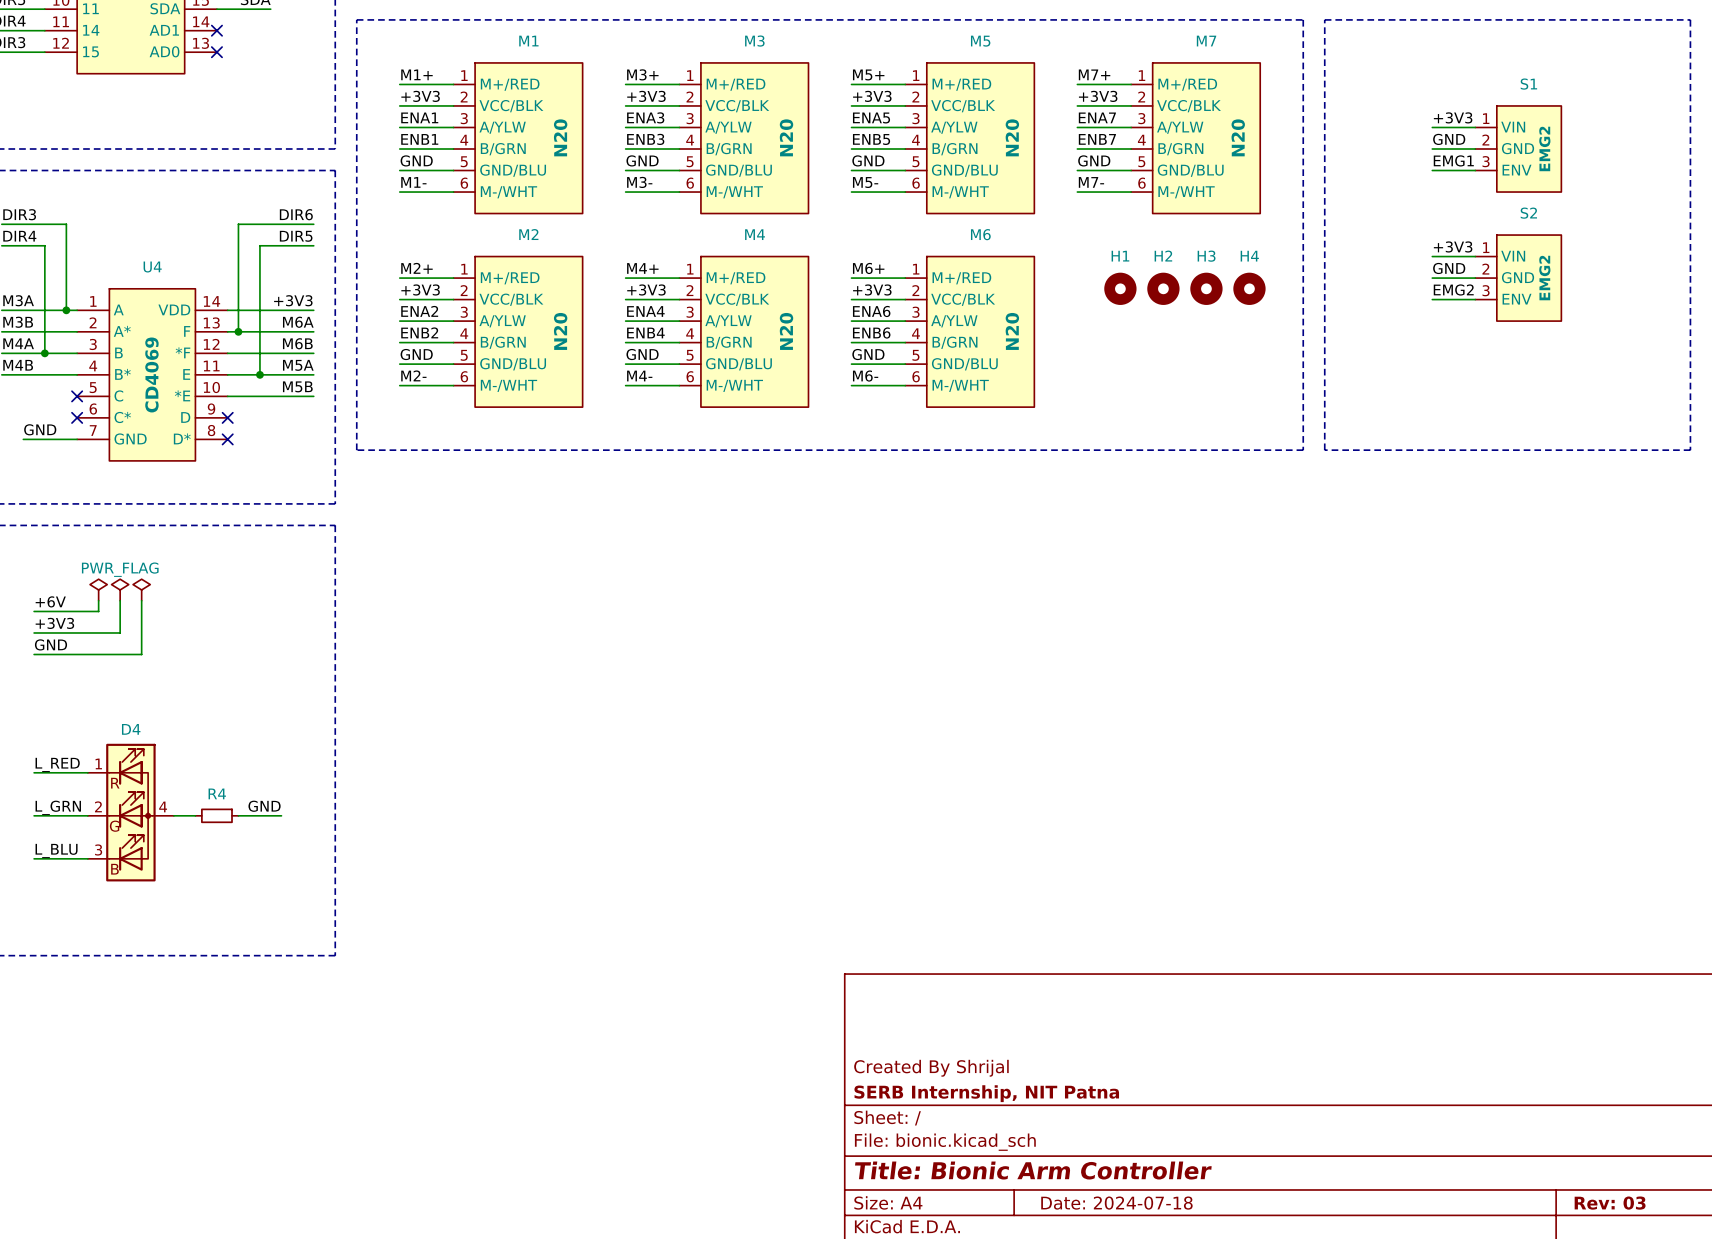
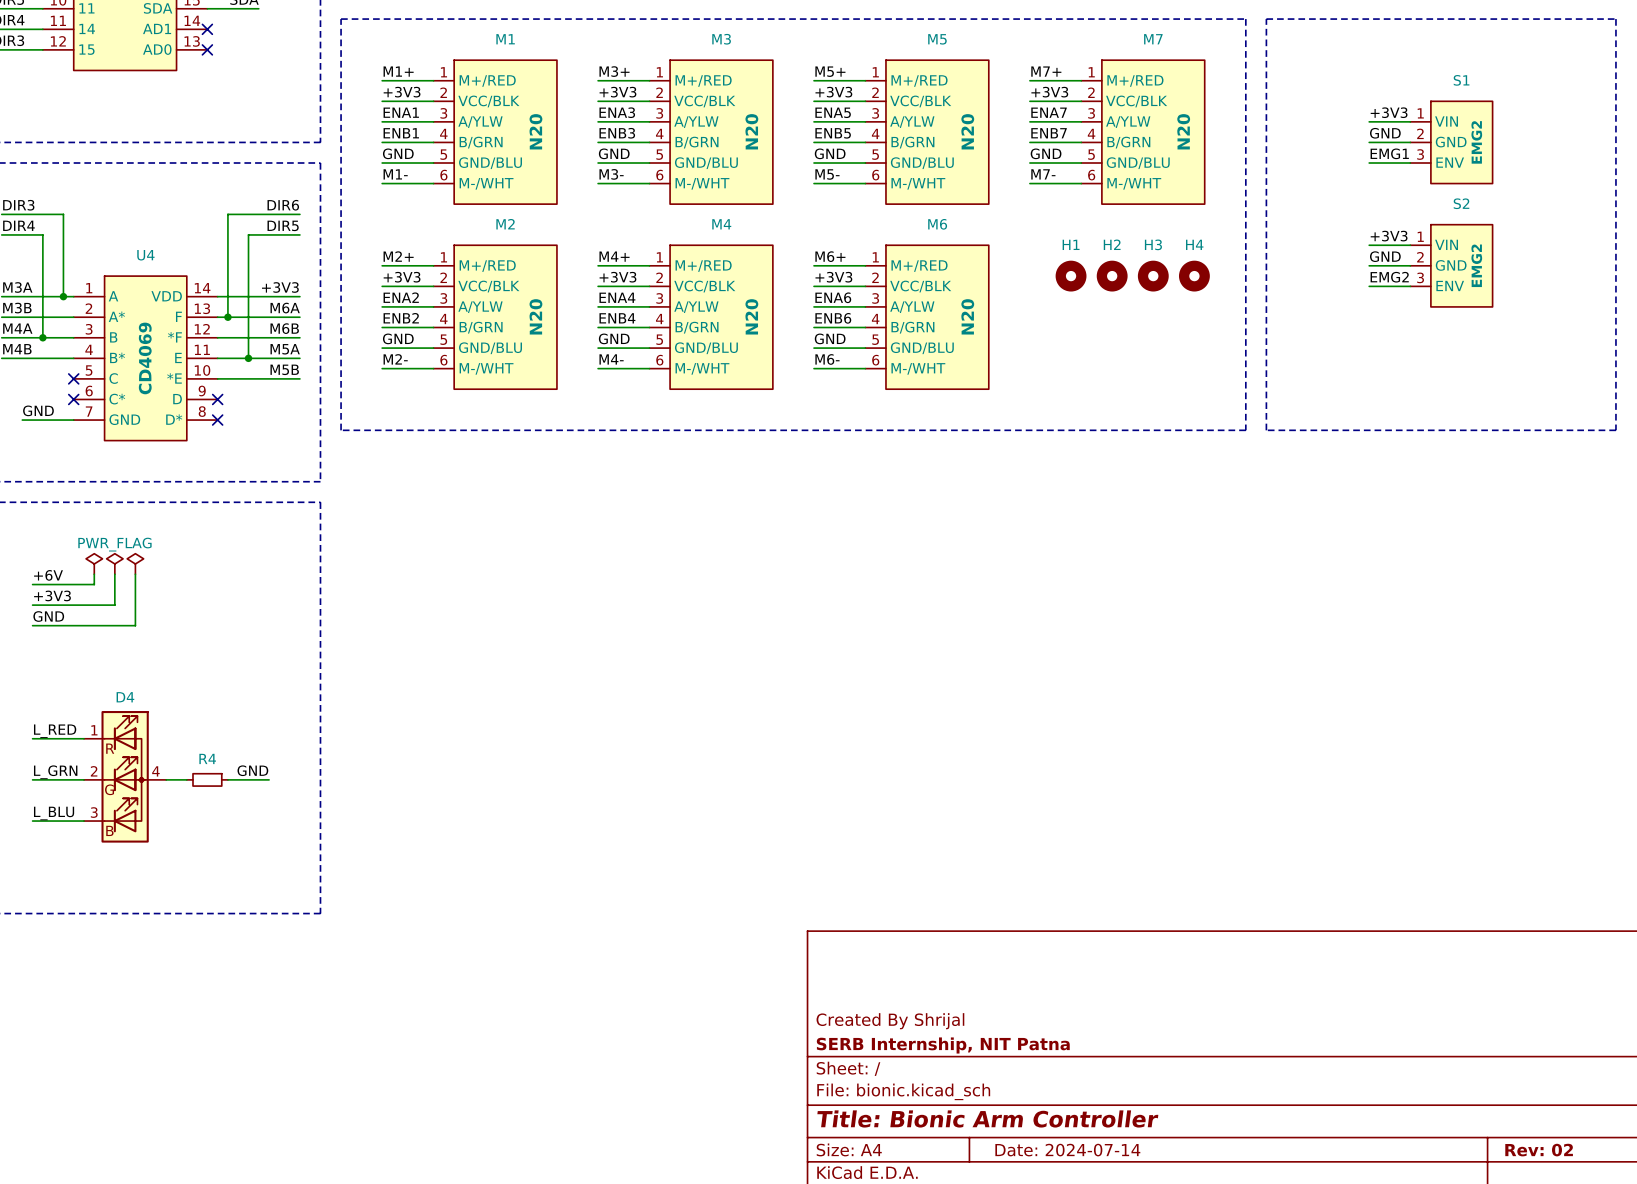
title block: Date: 2024-07-18 (1116, 1203) -> Date: 2024-07-14 (1067, 1150)
title block: Rev: 03 (1610, 1203) -> Rev: 02 (1539, 1150)

